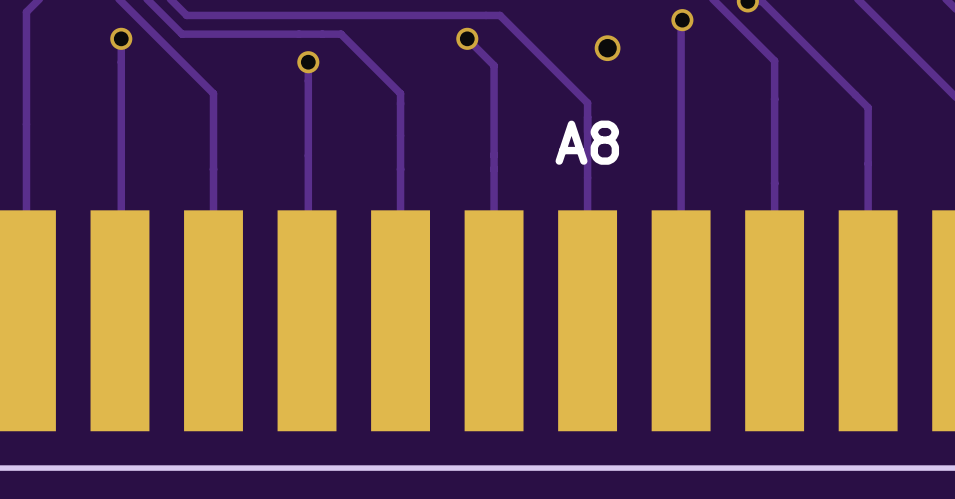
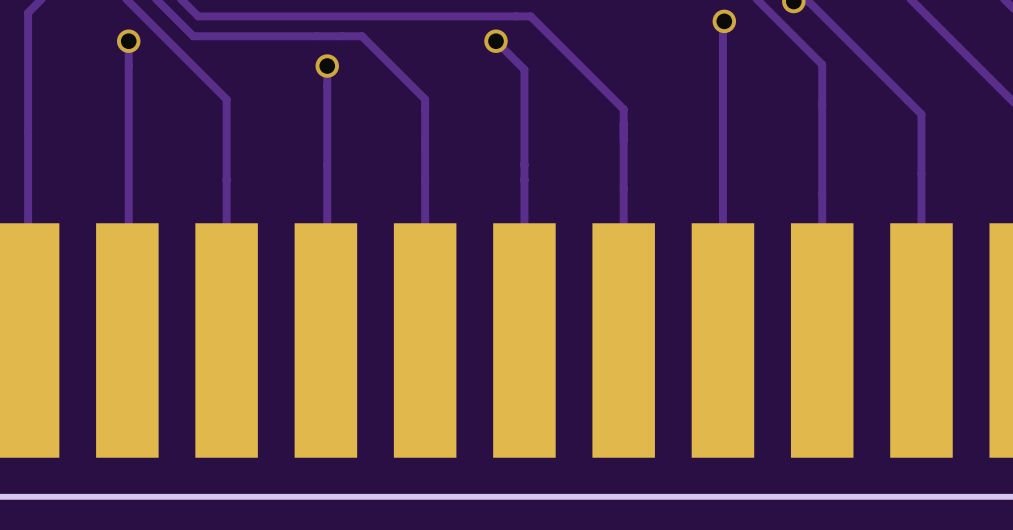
via: (607, 48) -> none
text: A8 (587, 142) -> none

